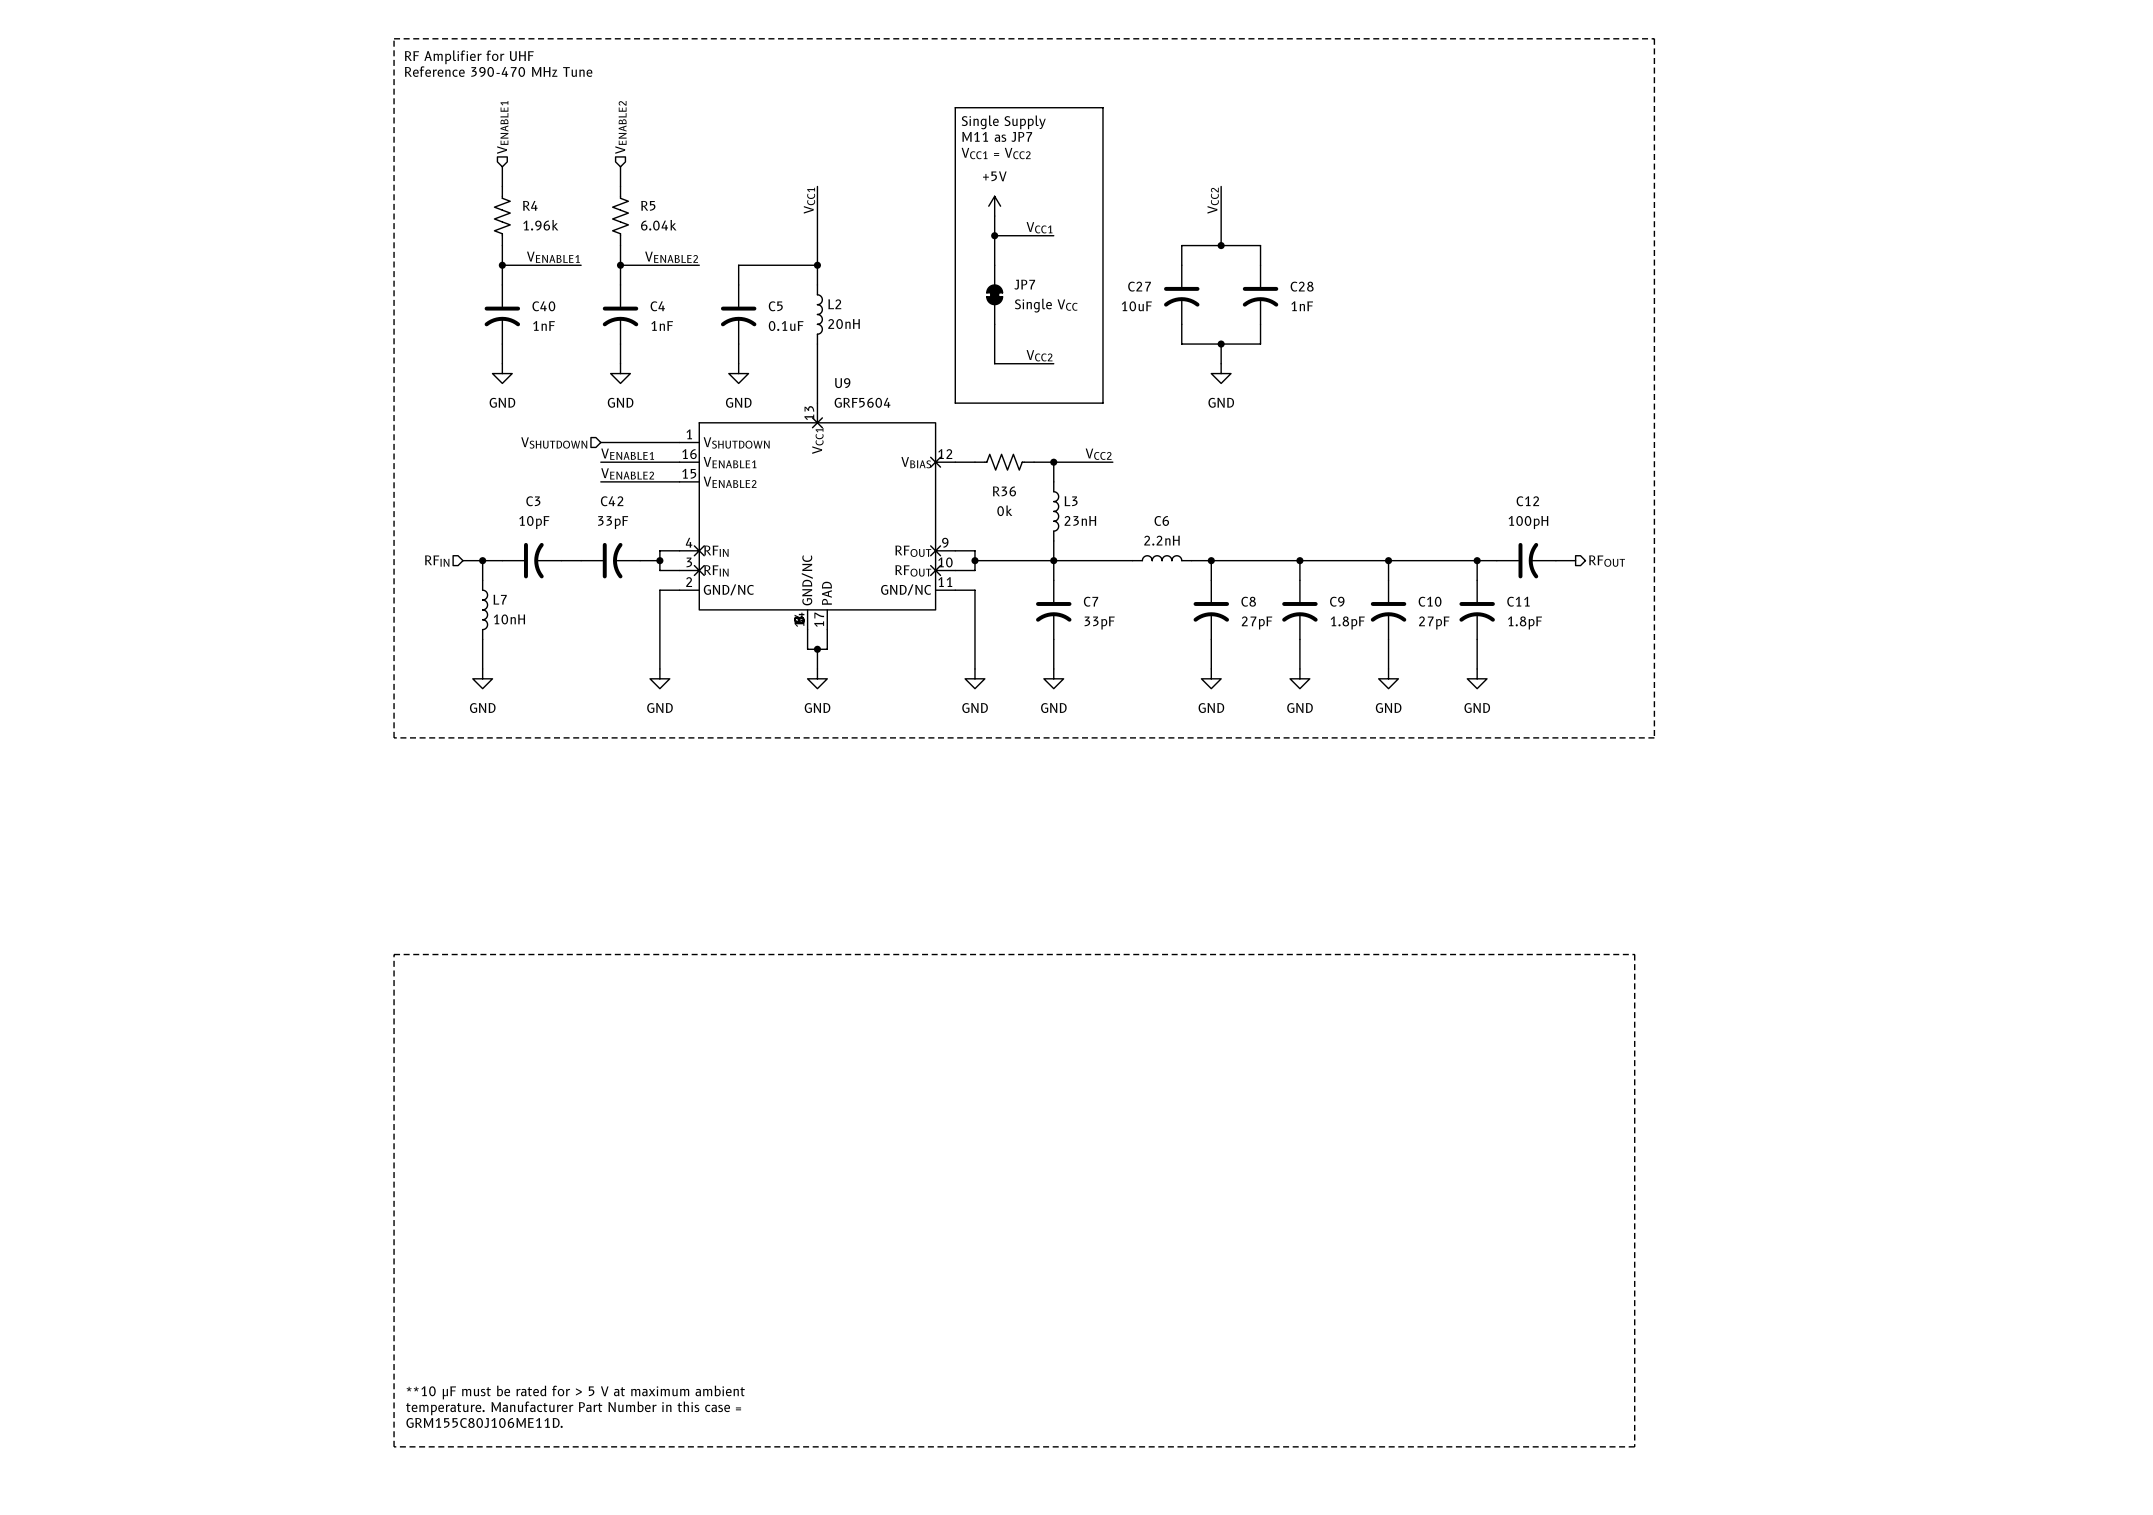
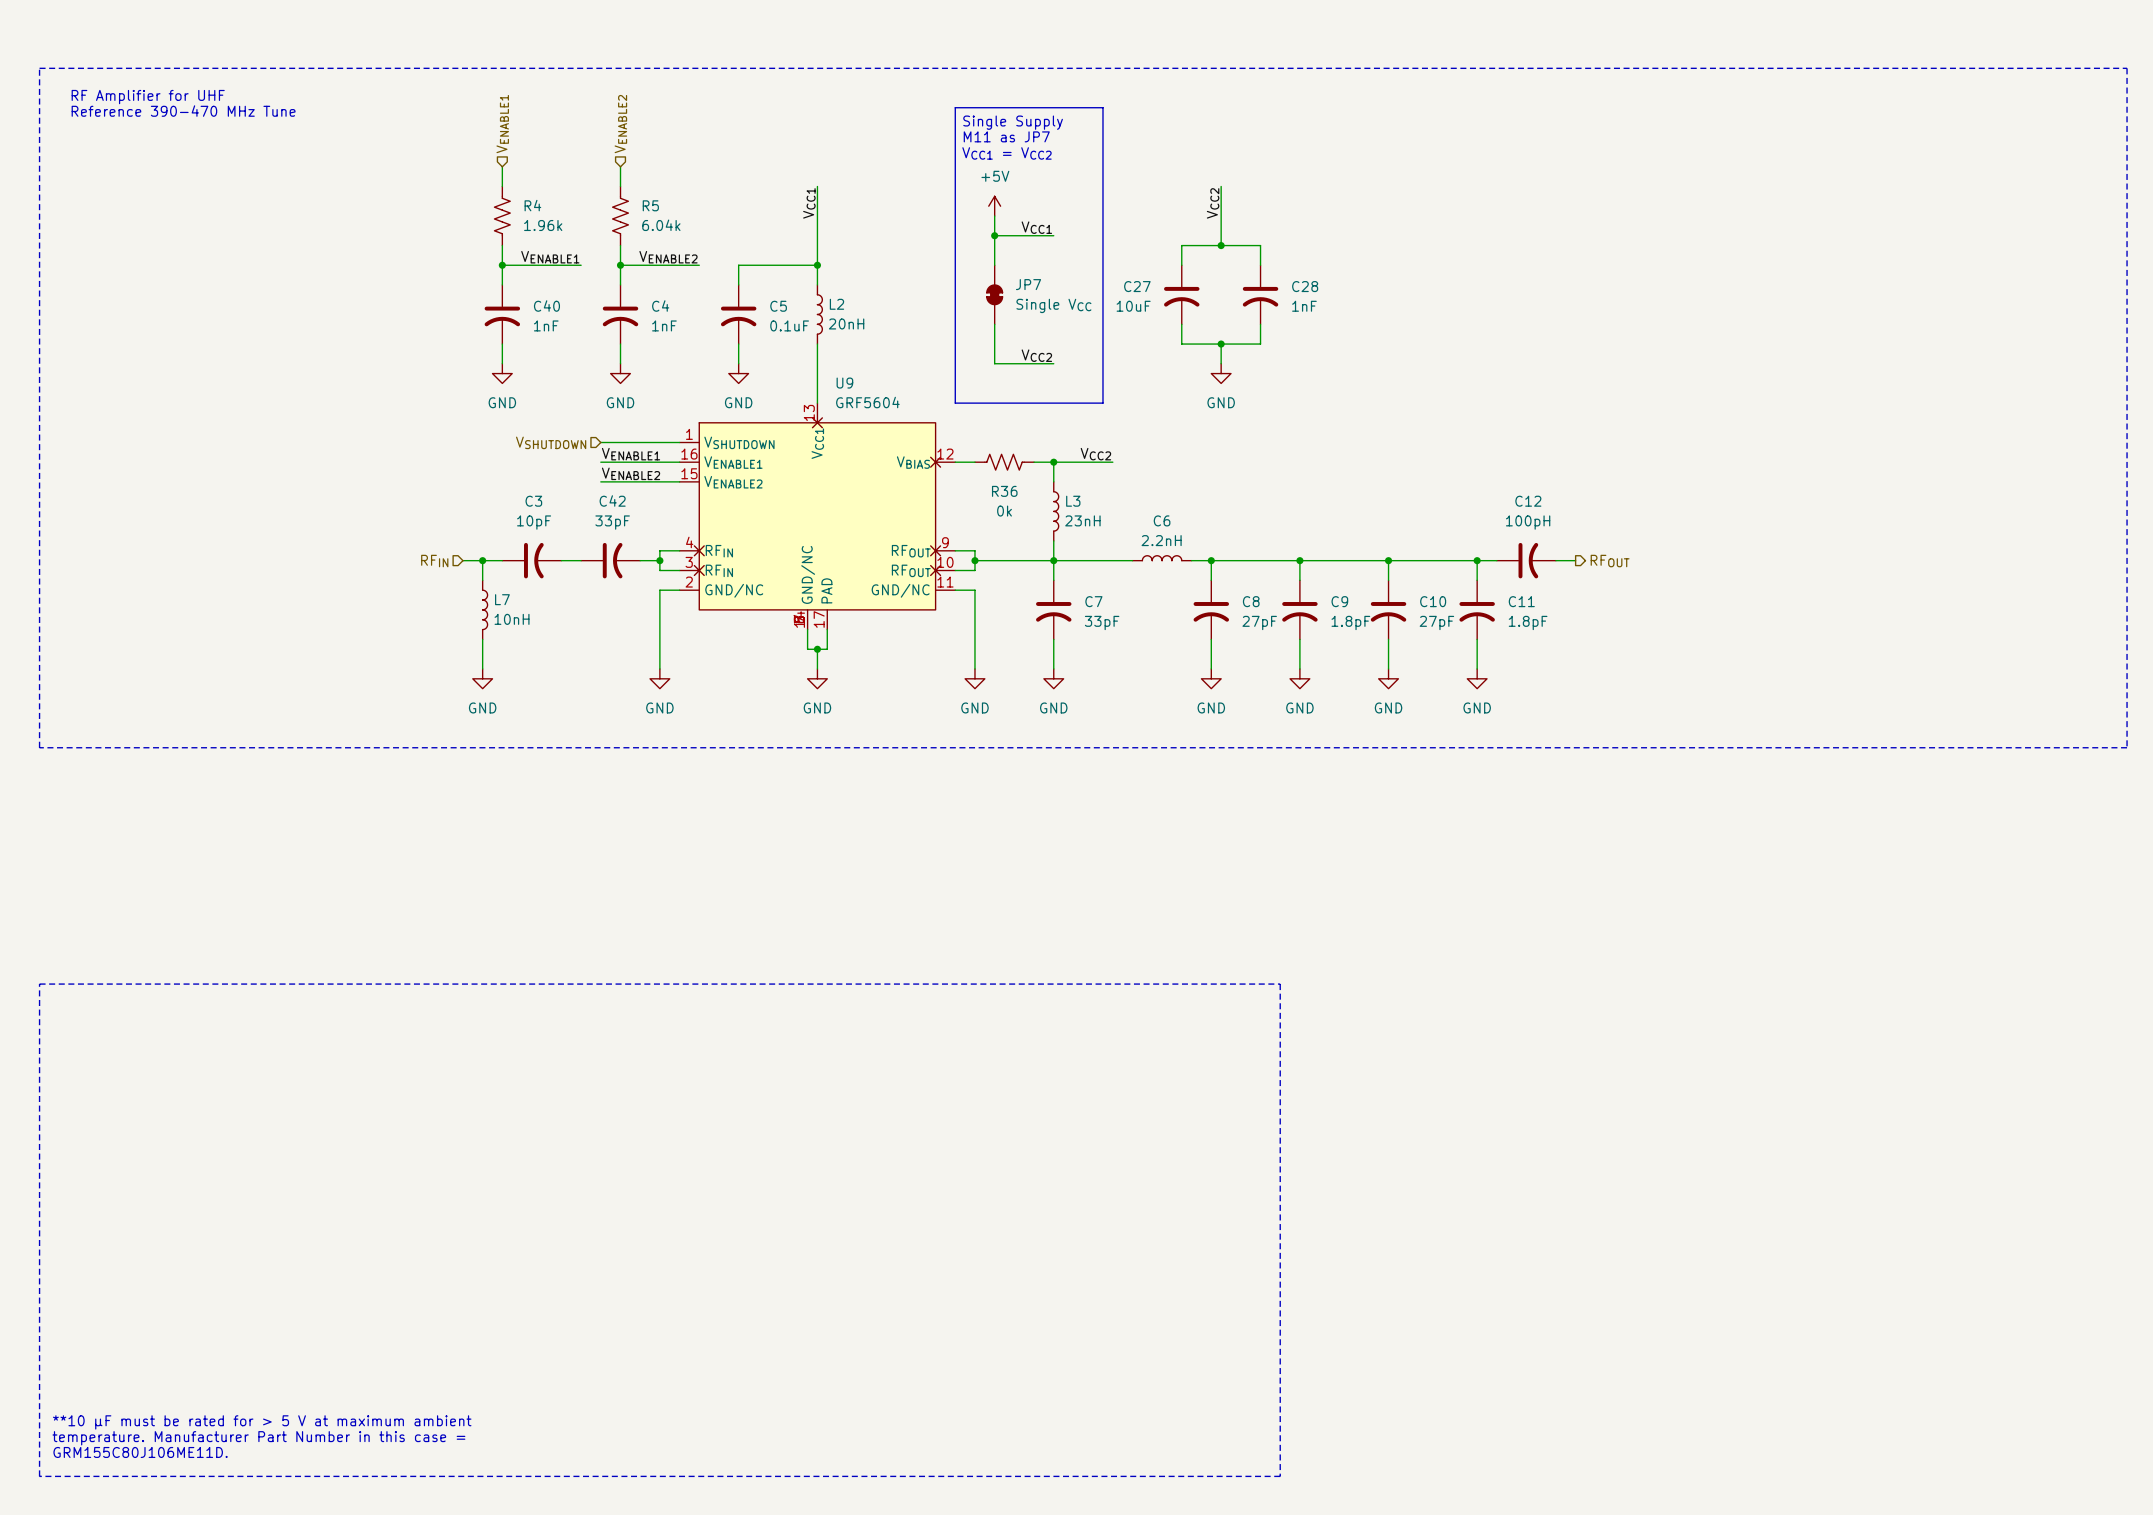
line: (394, 38) (394, 737) (1654, 737) (1654, 38) (394, 38) -> (39, 68) (39, 747) (2127, 747) (2127, 68) (39, 68)
text: RF Amplifier for UHF (469, 57) -> none
text: Reference 390-470 MHz Tune (498, 71) -> none
text: none -> RF Amplifier for UHF (148, 97)
text: none -> Reference 390-470 MHz Tune (183, 111)
line: (394, 954) (1634, 954) (1634, 1446) (394, 1446) (394, 954) -> (39, 984) (1280, 984) (1280, 1476) (39, 1476) (39, 984)
text: **10 μF must be rated for > 5 V at maximum ambient (575, 1392) -> none
text: temperature. Manufacturer Part Number in this case = (573, 1408) -> none
text: none -> **10 μF must be rated for > 5 V at maximum ambient (262, 1422)
text: GRM155C80J106ME11D. (484, 1422) -> none
text: none -> temperature. Manufacturer Part Number in this case = (258, 1438)
text: none -> GRM155C80J106ME11D. (140, 1452)

